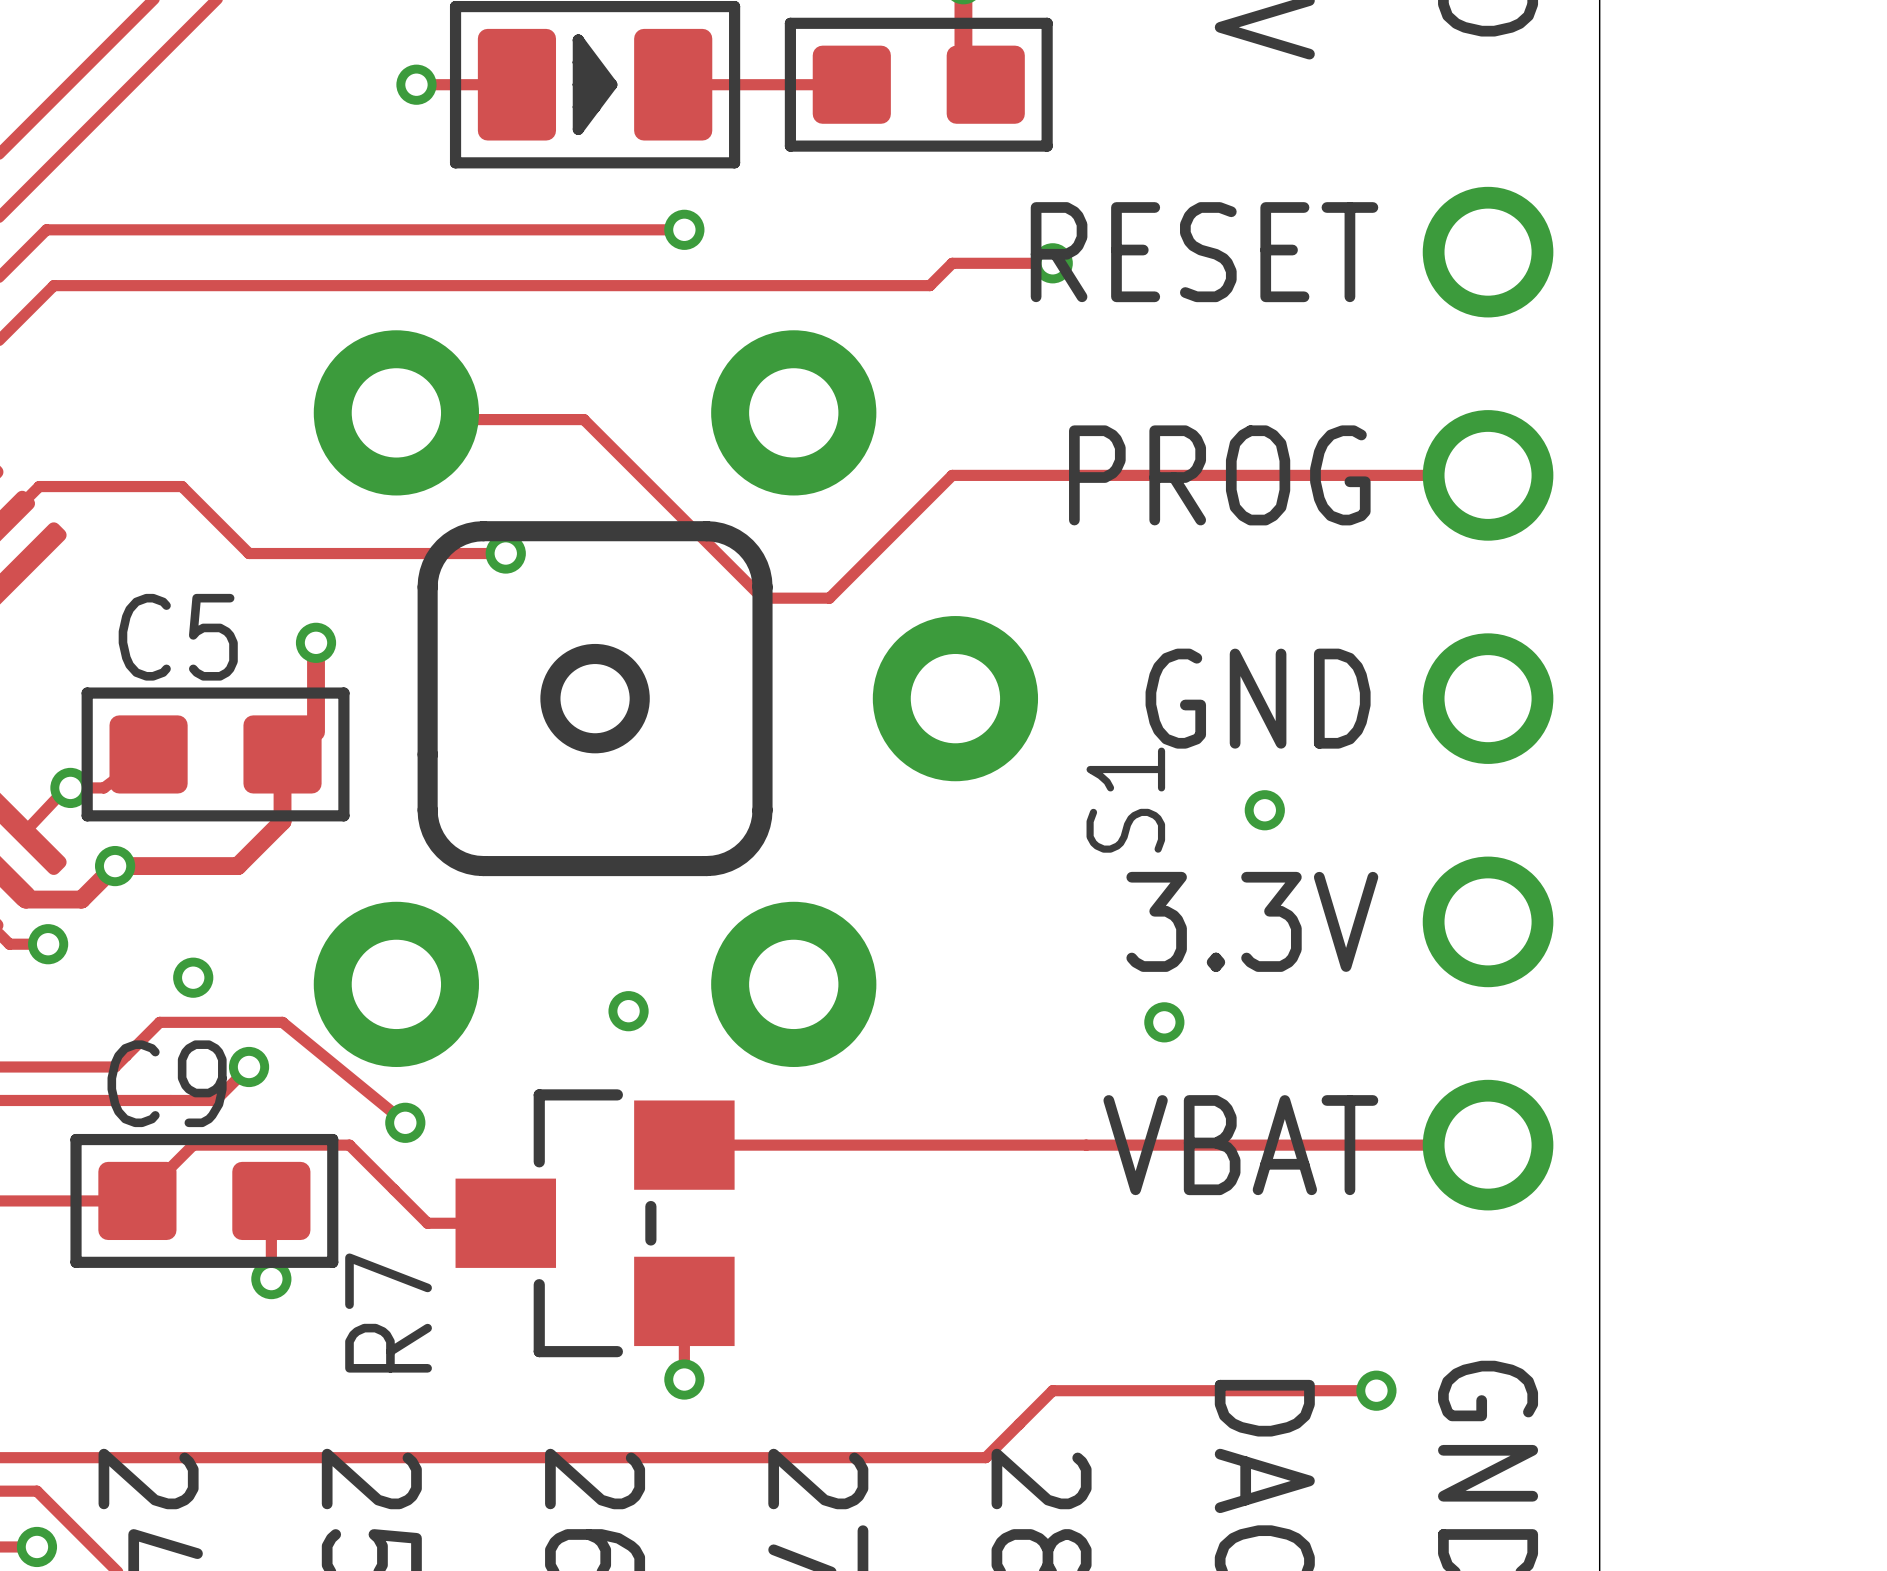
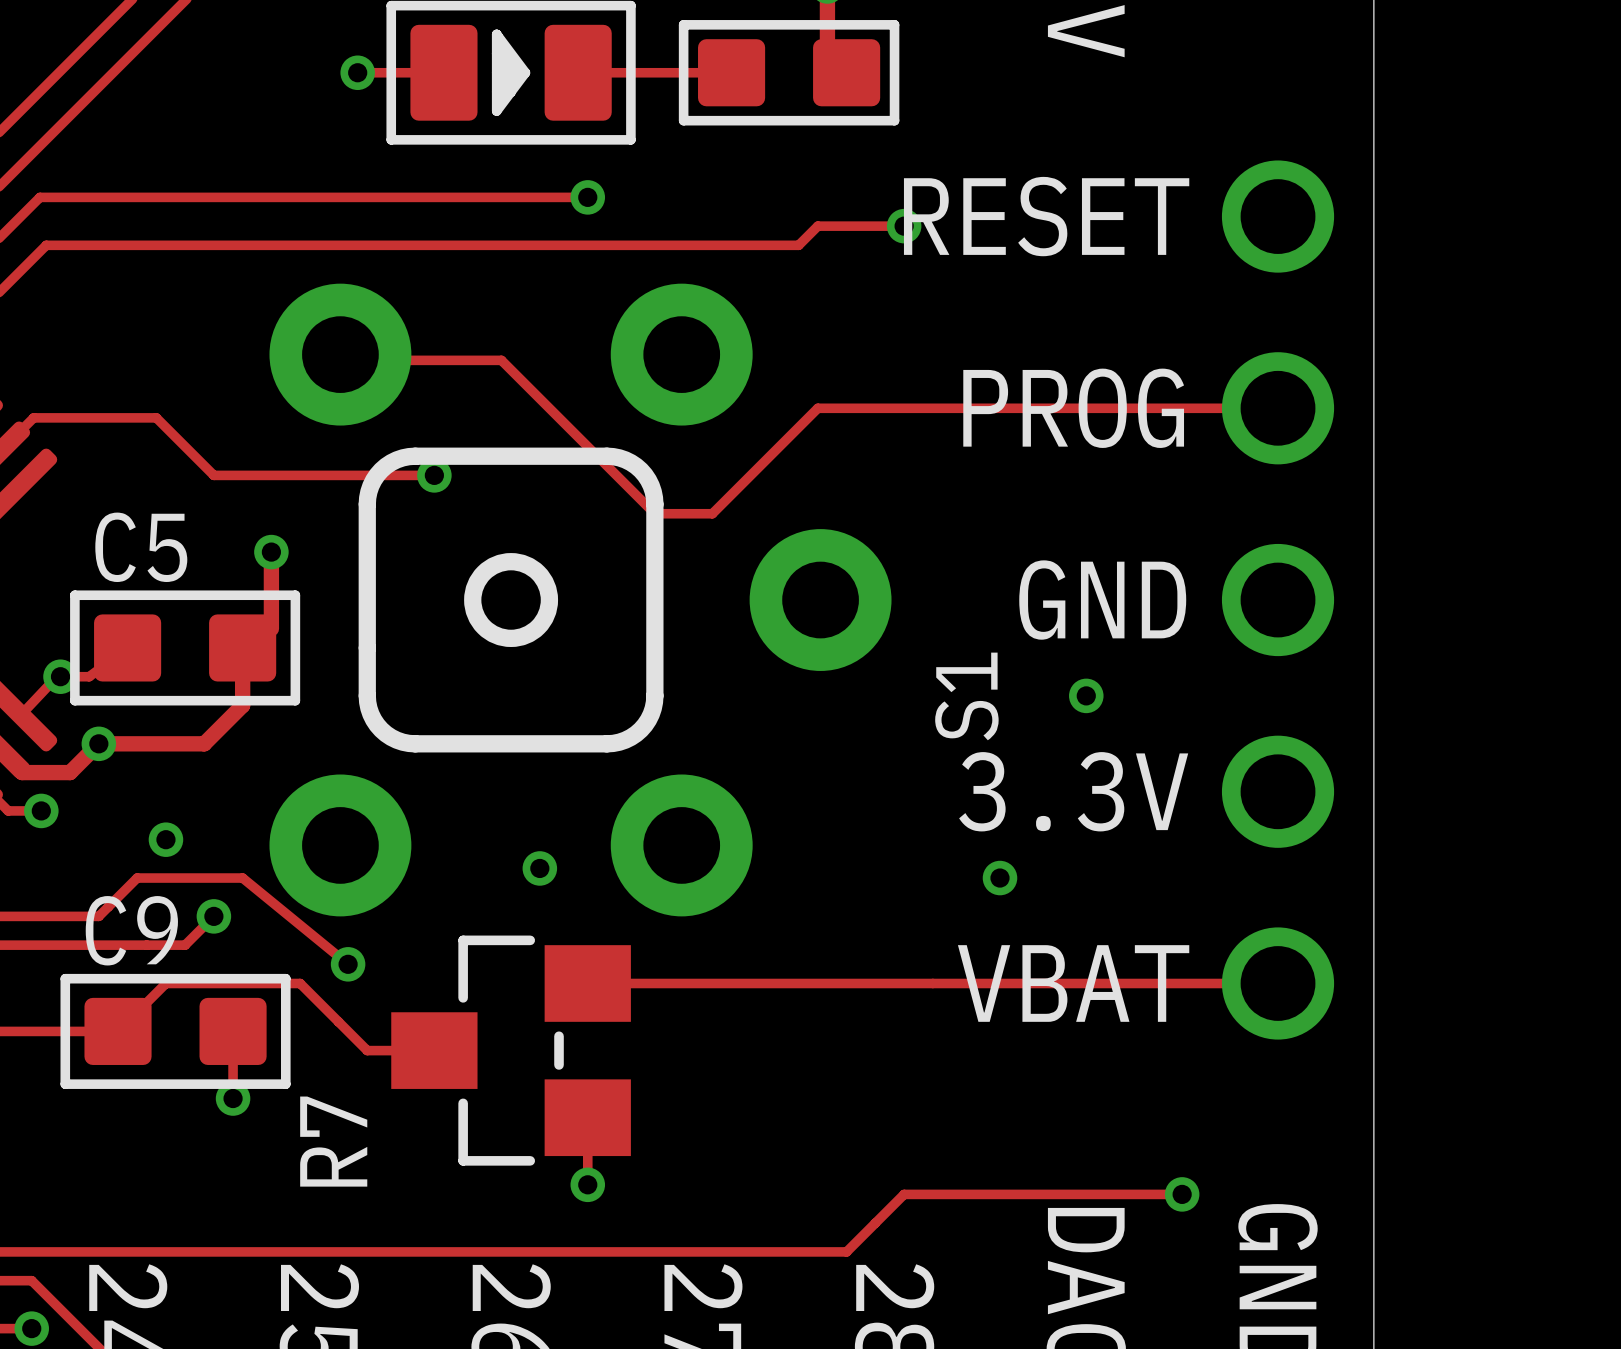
part footprint: [784, 17, 1053, 152] -> [678, 20, 900, 126]

